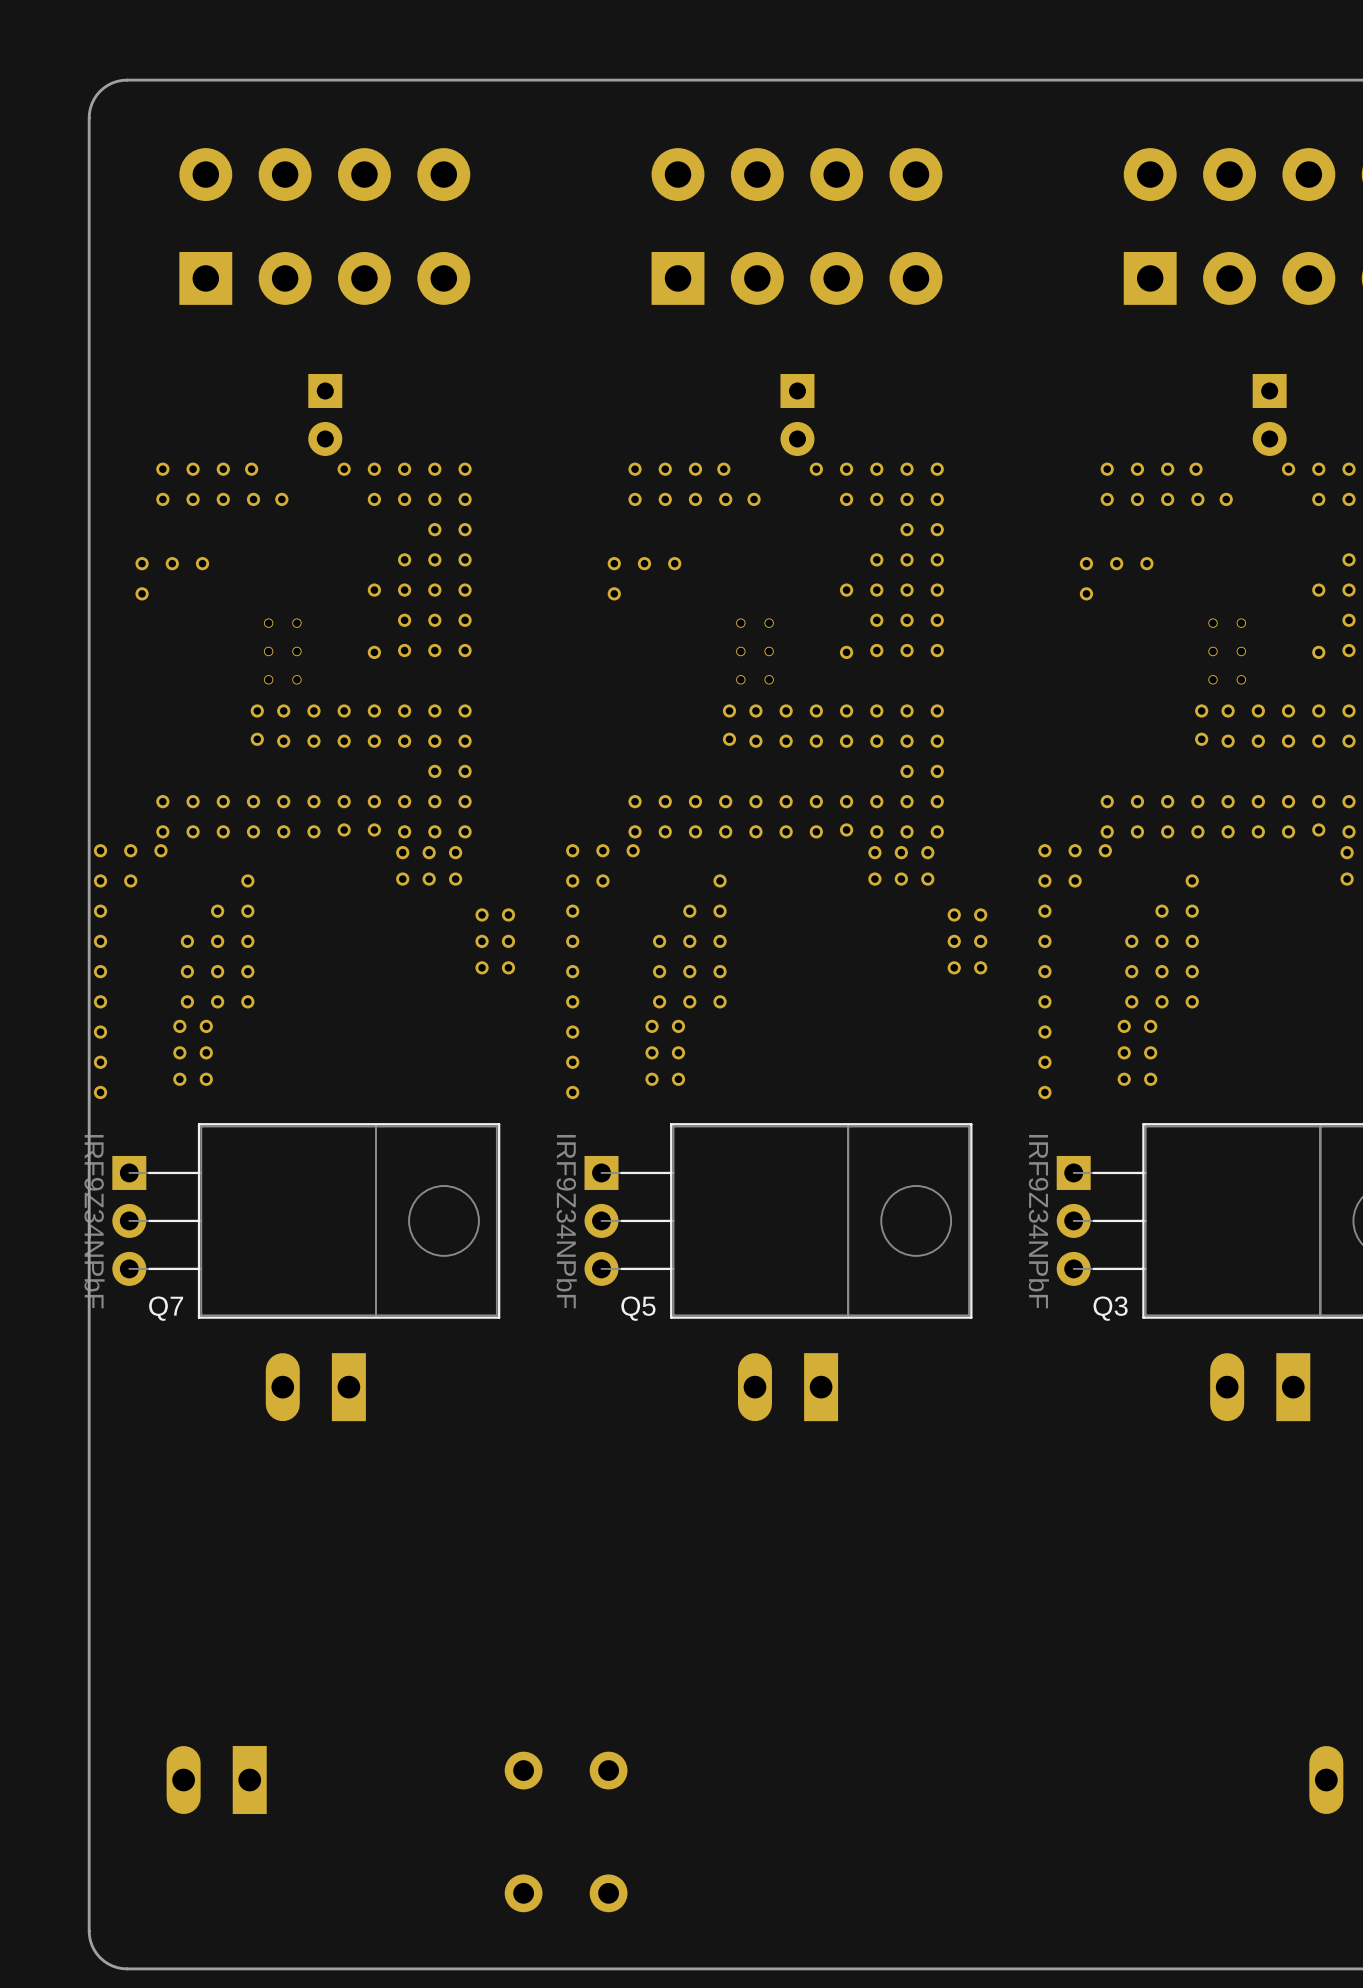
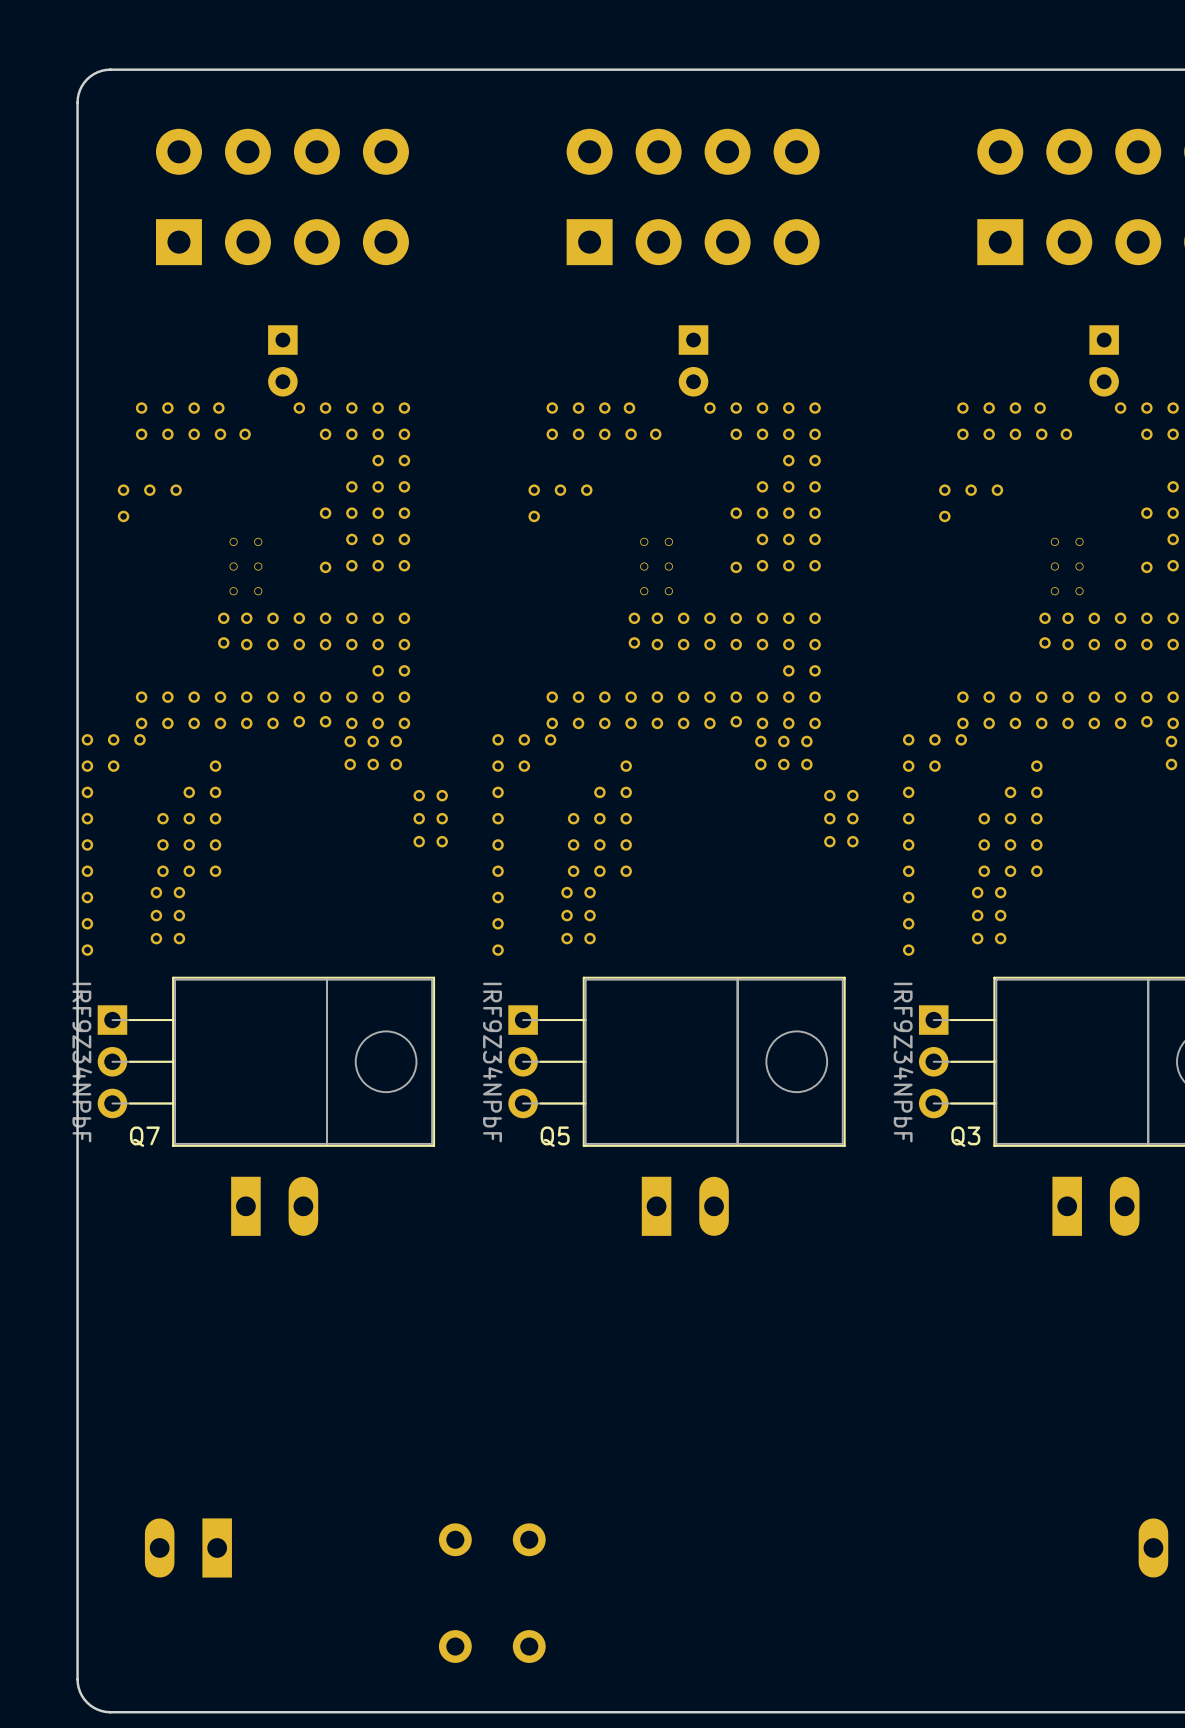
part rotation: 0° (315, 1387) -> 180° (274, 1206)
part rotation: 0° (788, 1387) -> 180° (685, 1206)
part rotation: 0° (1260, 1387) -> 180° (1095, 1206)

